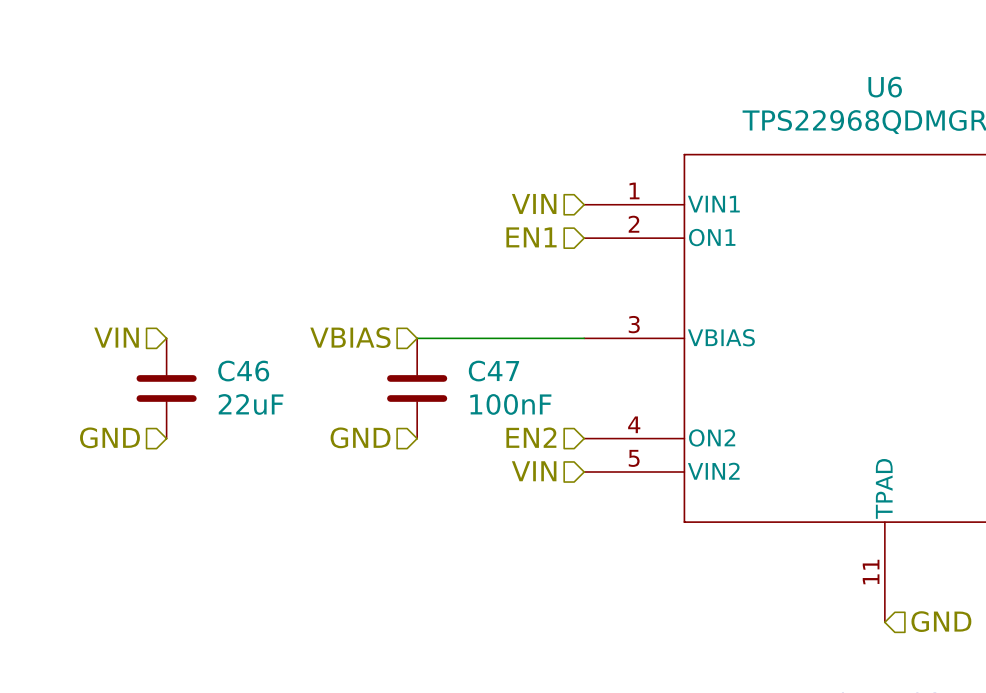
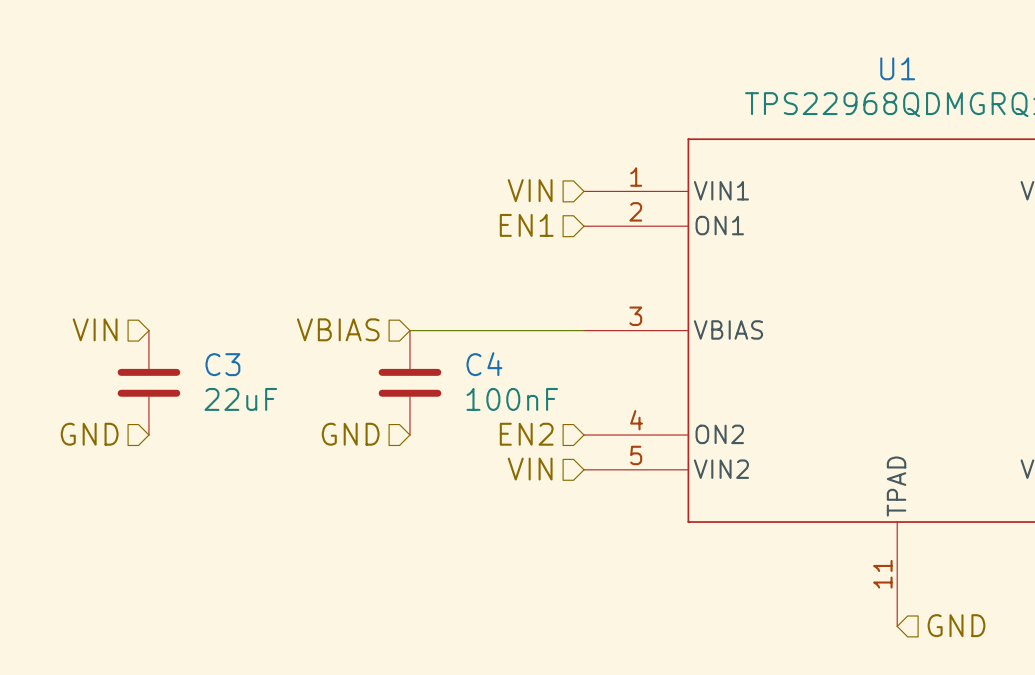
U6 name: U6 (885, 87) -> U1 (897, 68)
C46 name: C46 (243, 371) -> C3 (222, 364)
C47 name: C47 (493, 371) -> C4 (484, 364)

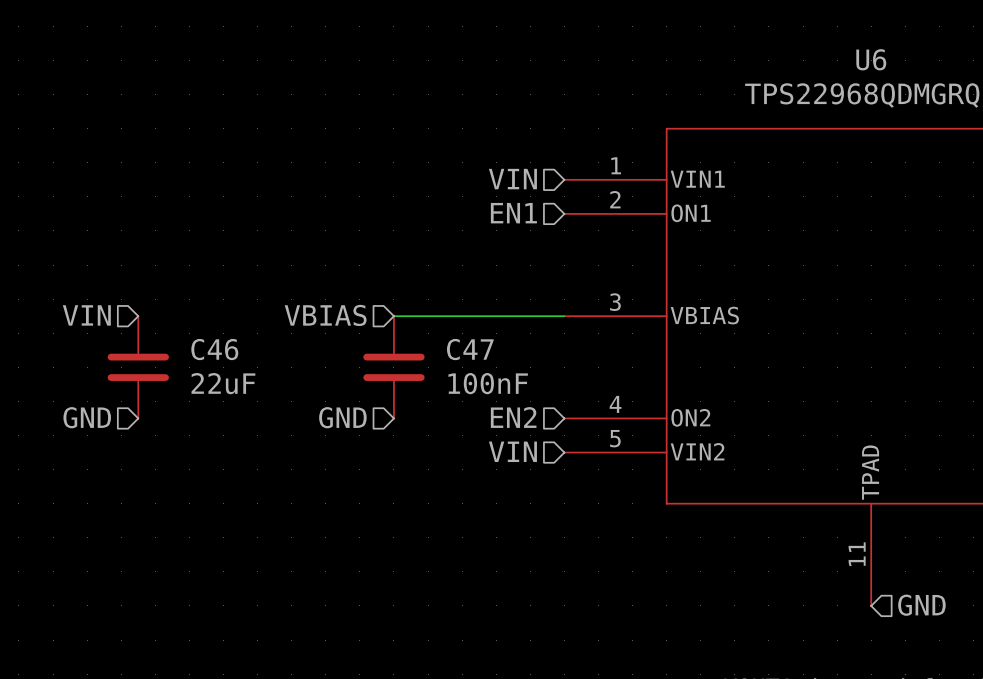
U1 name: U1 (897, 68) -> U6 (871, 59)
C3 name: C3 (222, 364) -> C46 (214, 349)
C4 name: C4 (484, 364) -> C47 (470, 349)

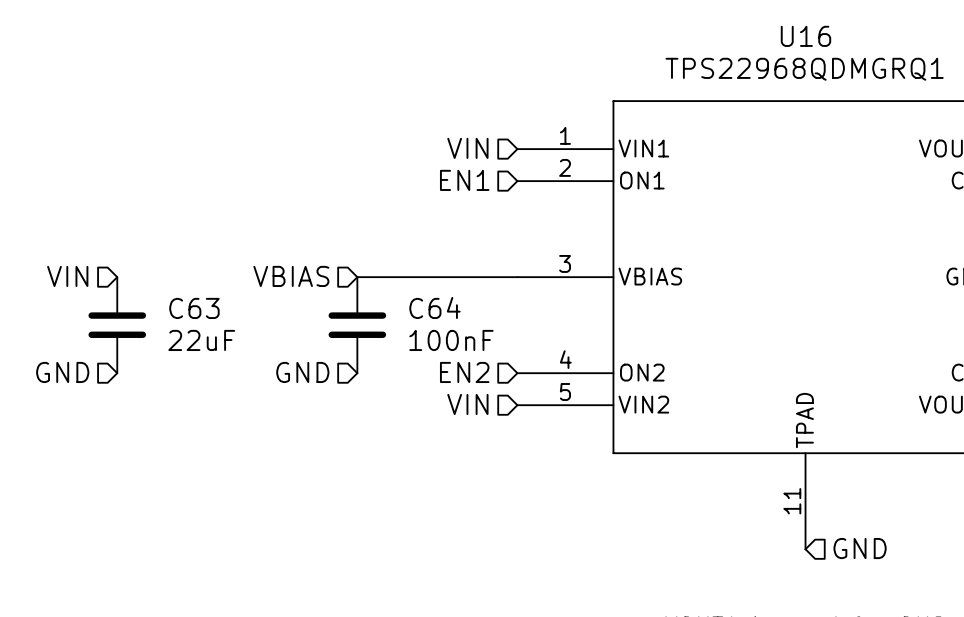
U6 name: U6 (871, 59) -> U16 (805, 36)
C46 name: C46 (214, 349) -> C63 (194, 308)
C47 name: C47 (470, 349) -> C64 (434, 307)

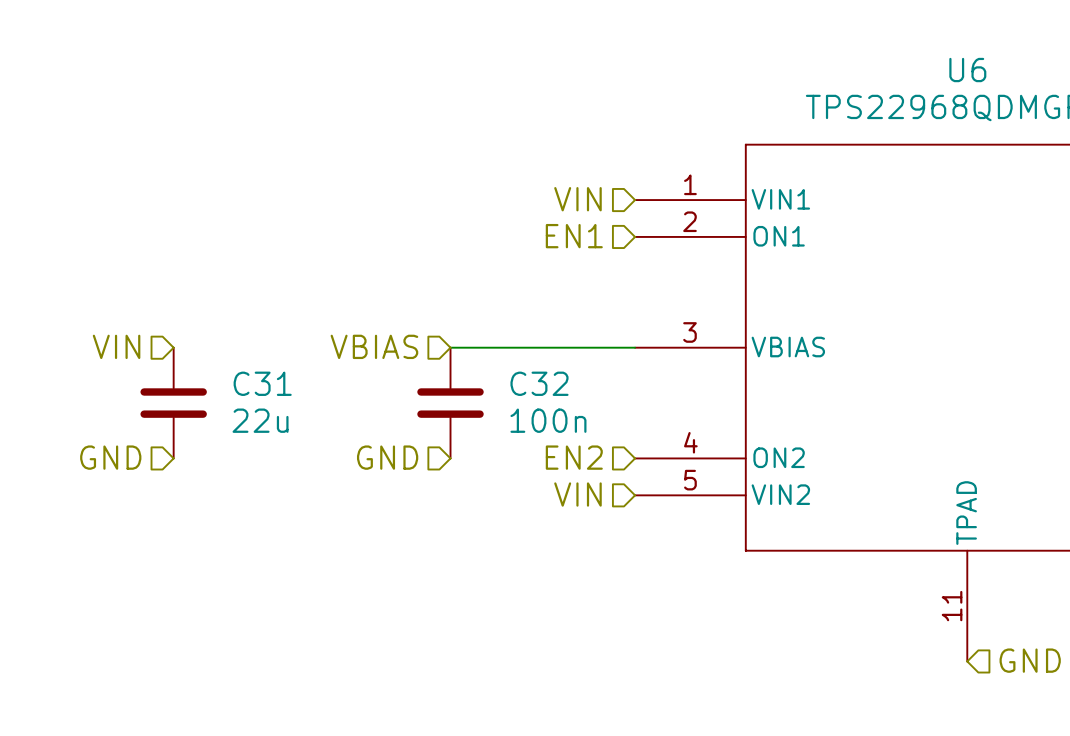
U16 name: U16 (805, 36) -> U6 (967, 70)
C64 name: C64 (434, 307) -> C32 (539, 383)
C63 name: C63 (194, 308) -> C31 (262, 383)
C63 value: 22uF (201, 340) -> 22u (260, 420)
C64 value: 100nF (451, 340) -> 100n (548, 420)

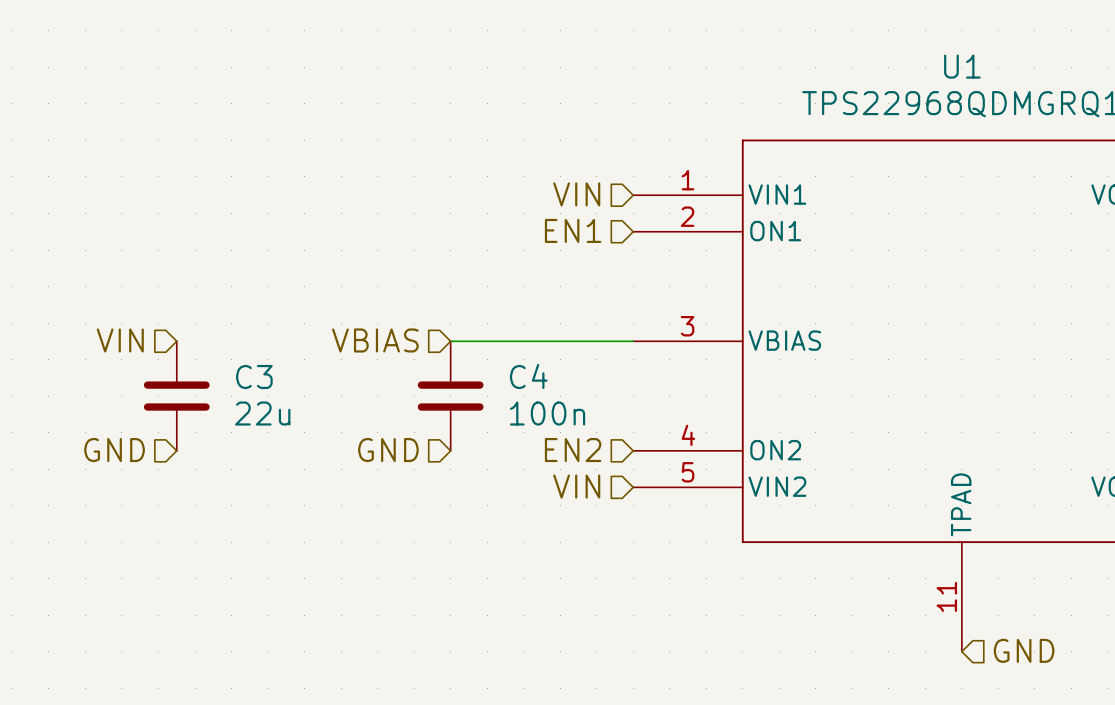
U6 name: U6 (967, 70) -> U1 (962, 66)
C31 name: C31 (262, 383) -> C3 (254, 376)
C32 name: C32 (539, 383) -> C4 (528, 376)

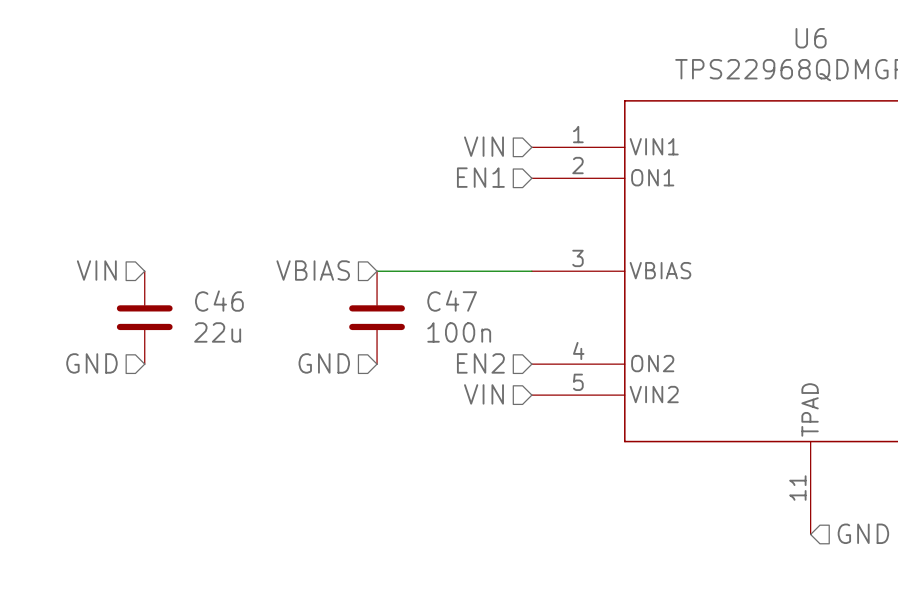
U1 name: U1 (962, 66) -> U6 (811, 38)
C3 name: C3 (254, 376) -> C46 (219, 301)
C4 name: C4 (528, 376) -> C47 (452, 301)

